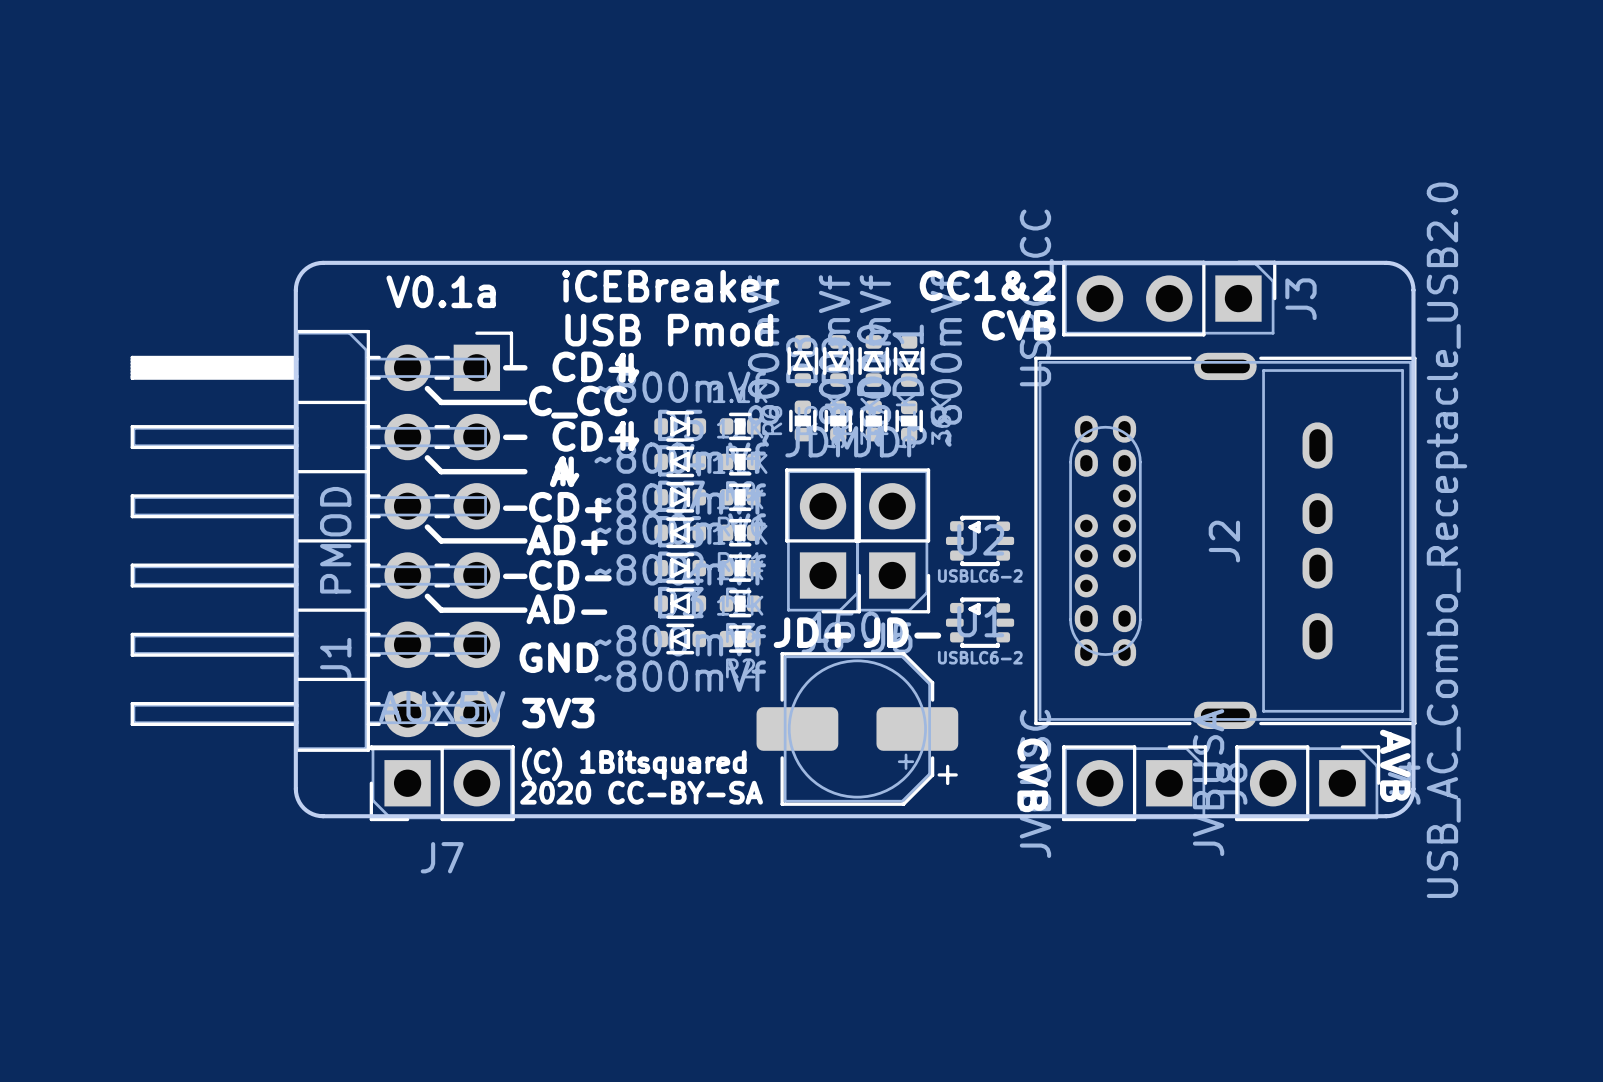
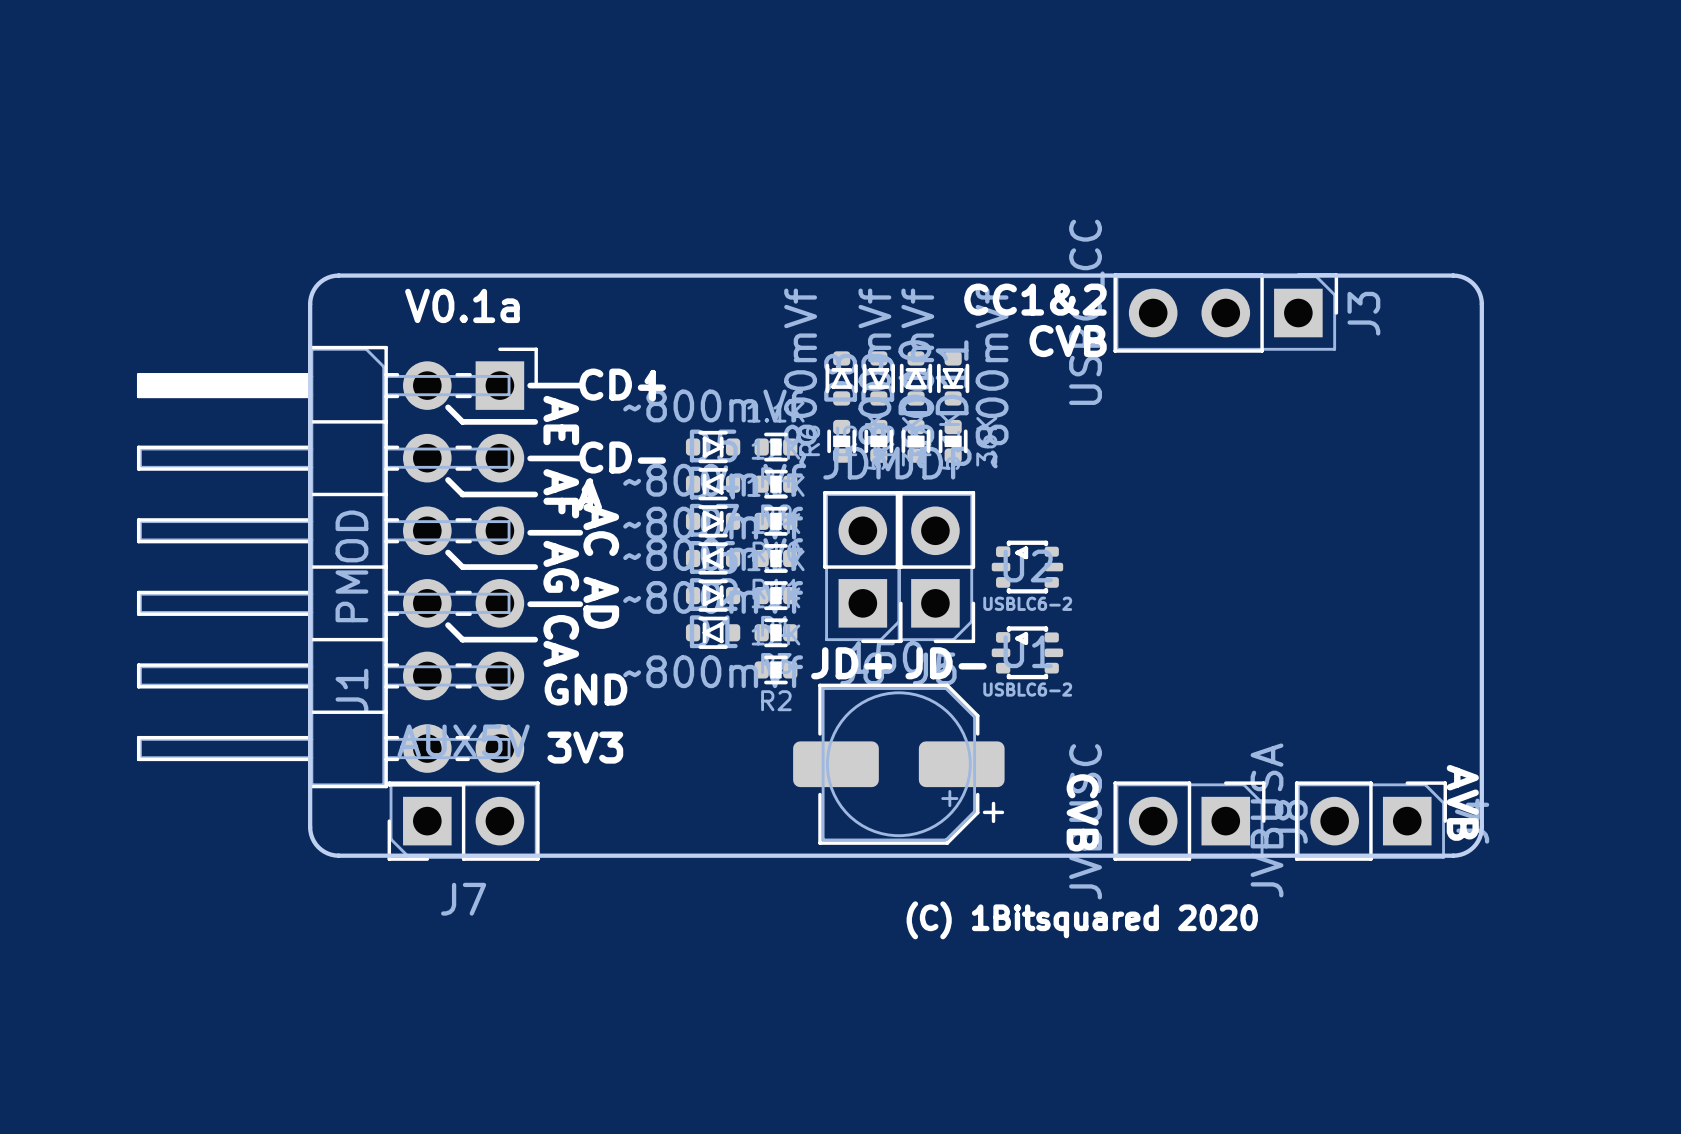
text: iCEBreaker (670, 286) -> none
text: USB Pmod (669, 330) -> none
line: (631, 355) (631, 380) (636, 371) -> none
line: none -> (550, 385) (580, 385)
text: none -> AE (561, 420)
line: (510, 402) (524, 402) -> none
text: C_CC (578, 402) -> none
line: (631, 423) (631, 448) (636, 440) -> none
line: (617, 431) (622, 423) (622, 448) -> none
line: none -> (550, 458) (580, 458)
line: (571, 459) (571, 483) (576, 475) -> none
line: (510, 471) (524, 471) -> none
text: none -> AF (561, 493)
text: none -> AC (601, 529)
text: CD+ (570, 507) -> none
line: none -> (550, 532) (580, 532)
text: AD+ (567, 539) -> none
line: (510, 540) (524, 540) -> none
text: none -> AG (561, 566)
J2: USB_AC_Combo_Receptacle_USB2.0 (1225, 540) -> none
text: CD- (570, 575) -> none
text: none -> AD (601, 602)
line: none -> (550, 604) (580, 604)
text: AD- (566, 609) -> none
line: (510, 610) (524, 610) -> none
text: none -> CA (561, 641)
part: ~800mVf (680, 639) -> none
text: (C) 1Bitsquared (634, 764) -> none
text: 2020 CC-BY-SA (641, 792) -> none
text: none -> (C) 1Bitsquared 2020 (1082, 920)

